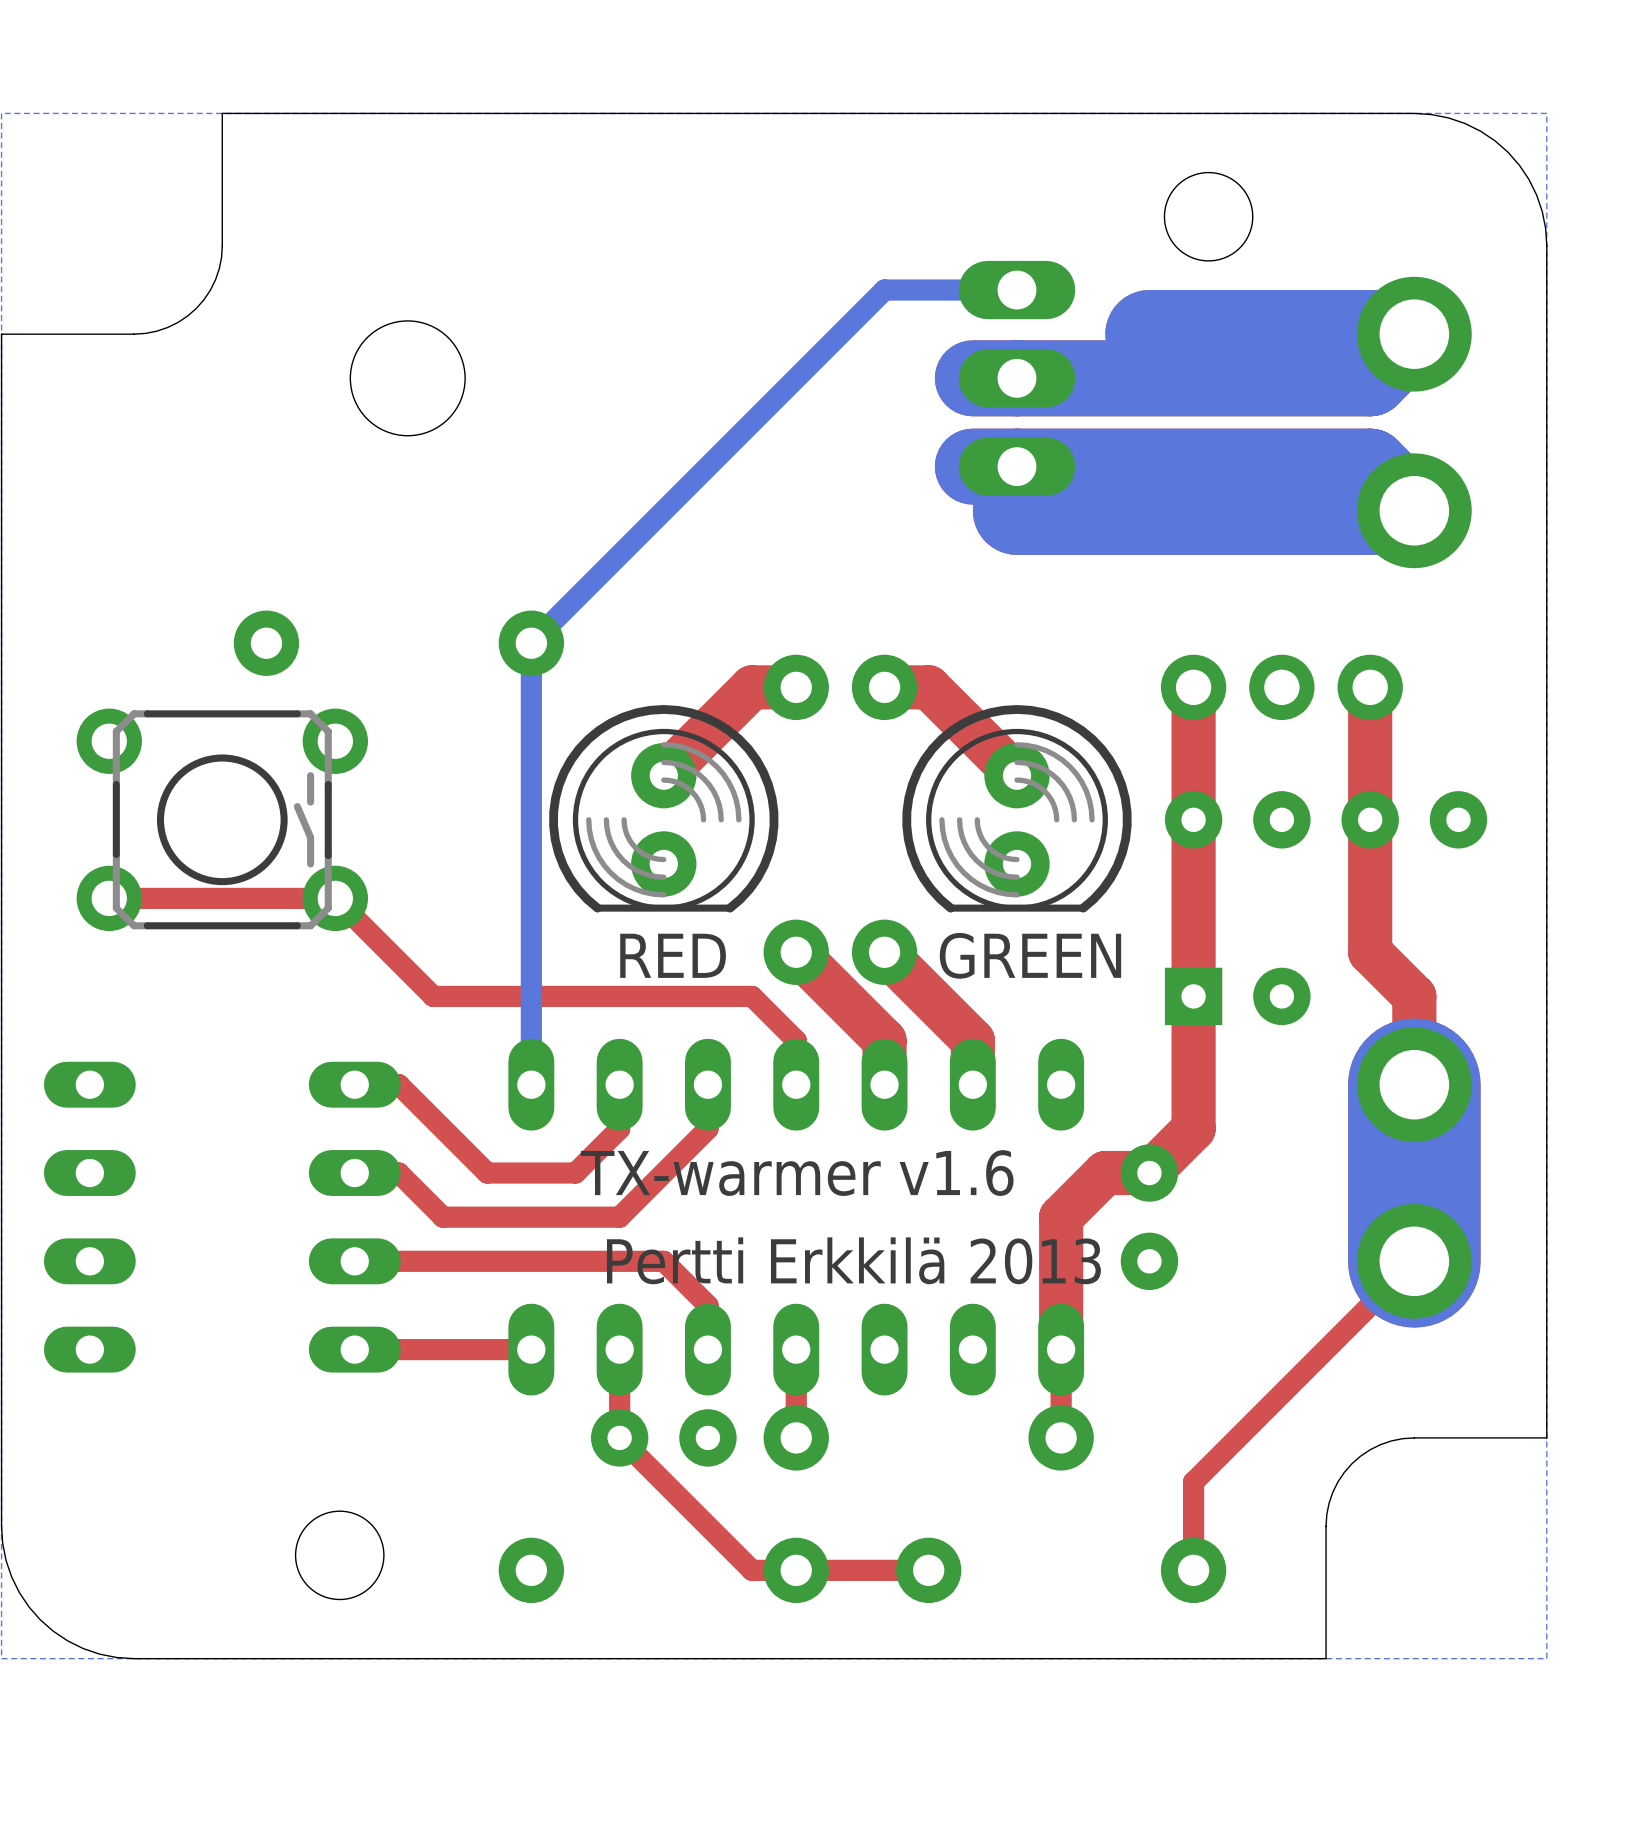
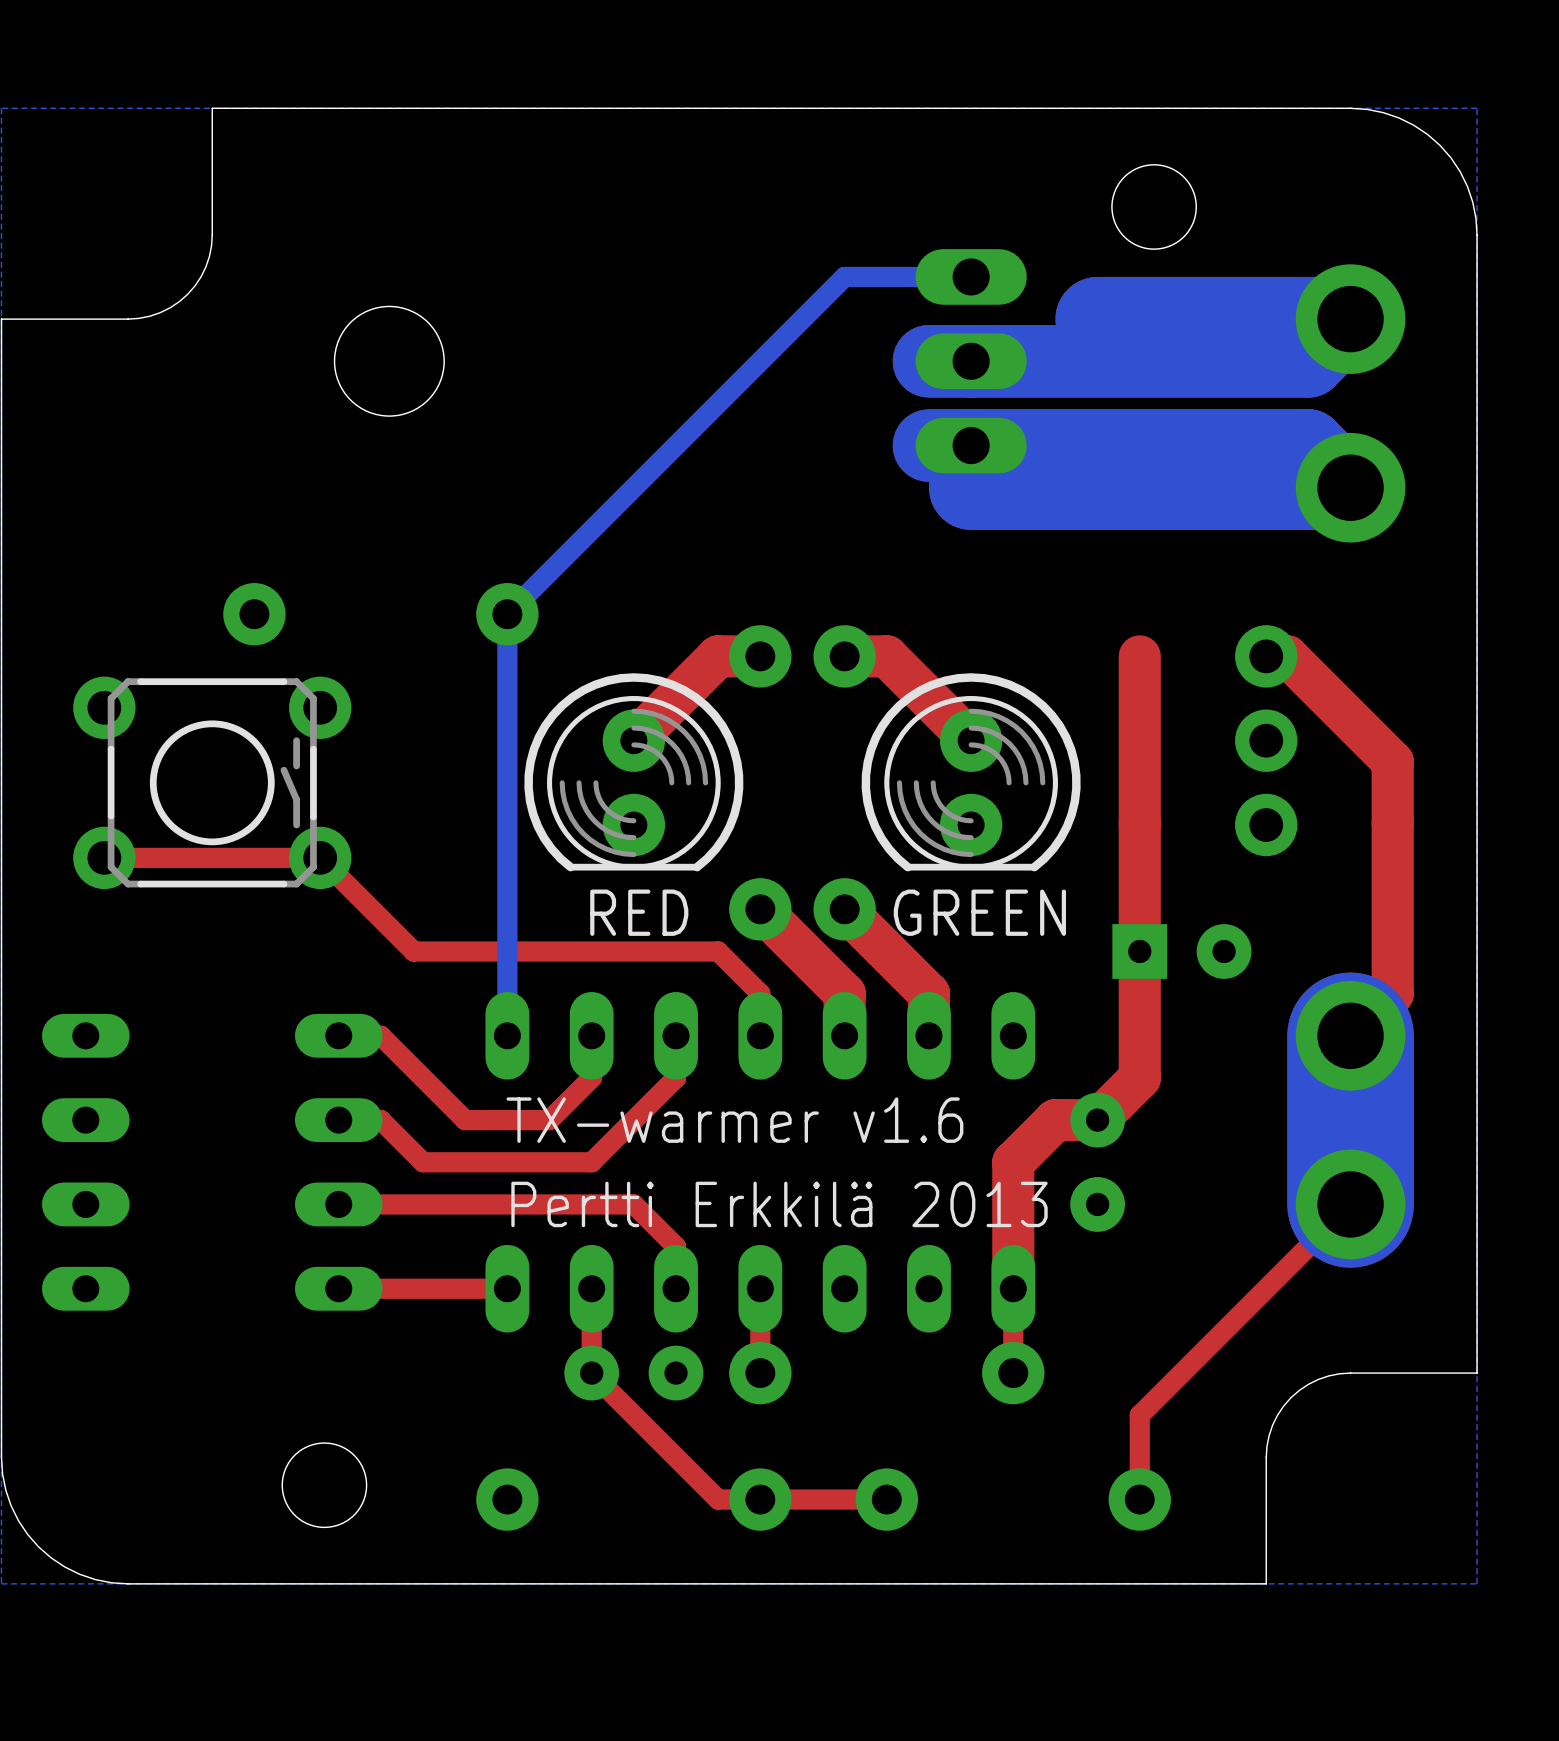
part rotation: 0° (1281, 687) -> 90° clockwise (1266, 740)
top track: (1370, 687) (1370, 952) (1414, 996) (1414, 1084) -> (1266, 656) (1287, 656) (1392, 761) (1392, 993) (1350, 1035)
part: (1237, 819) -> none
part: (1414, 819) -> none

